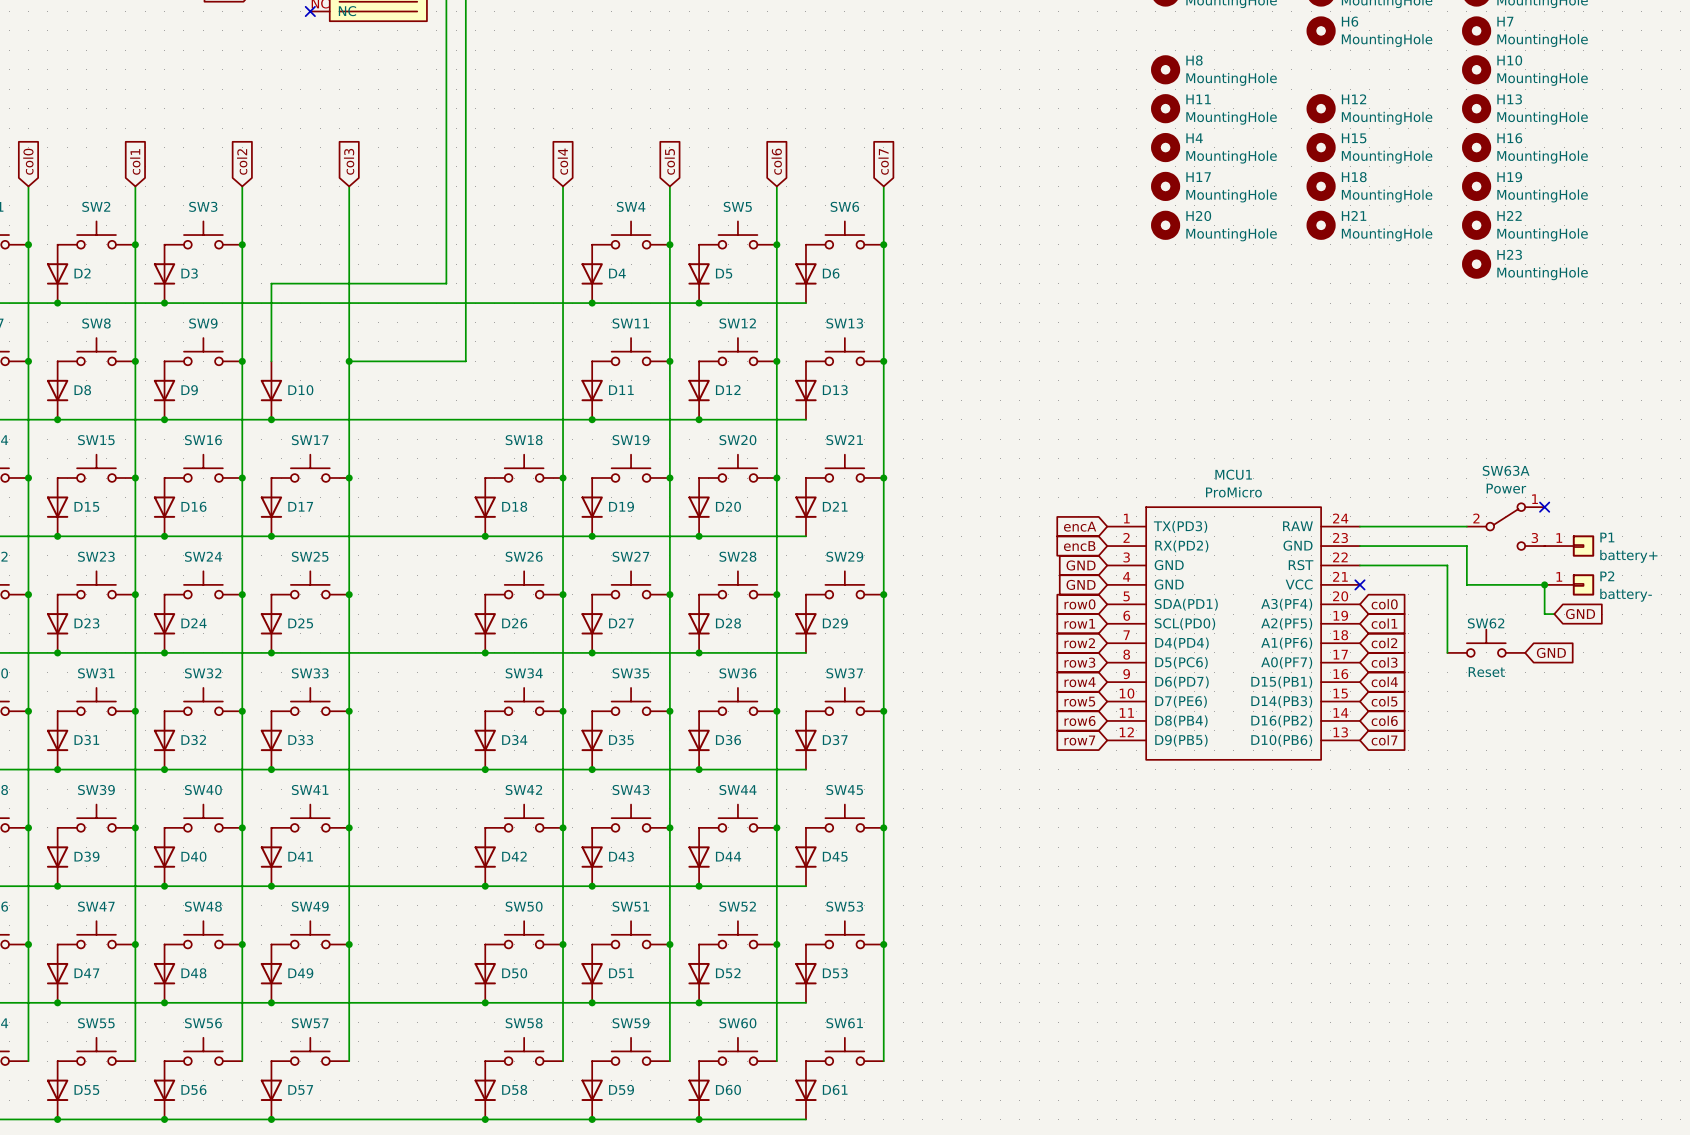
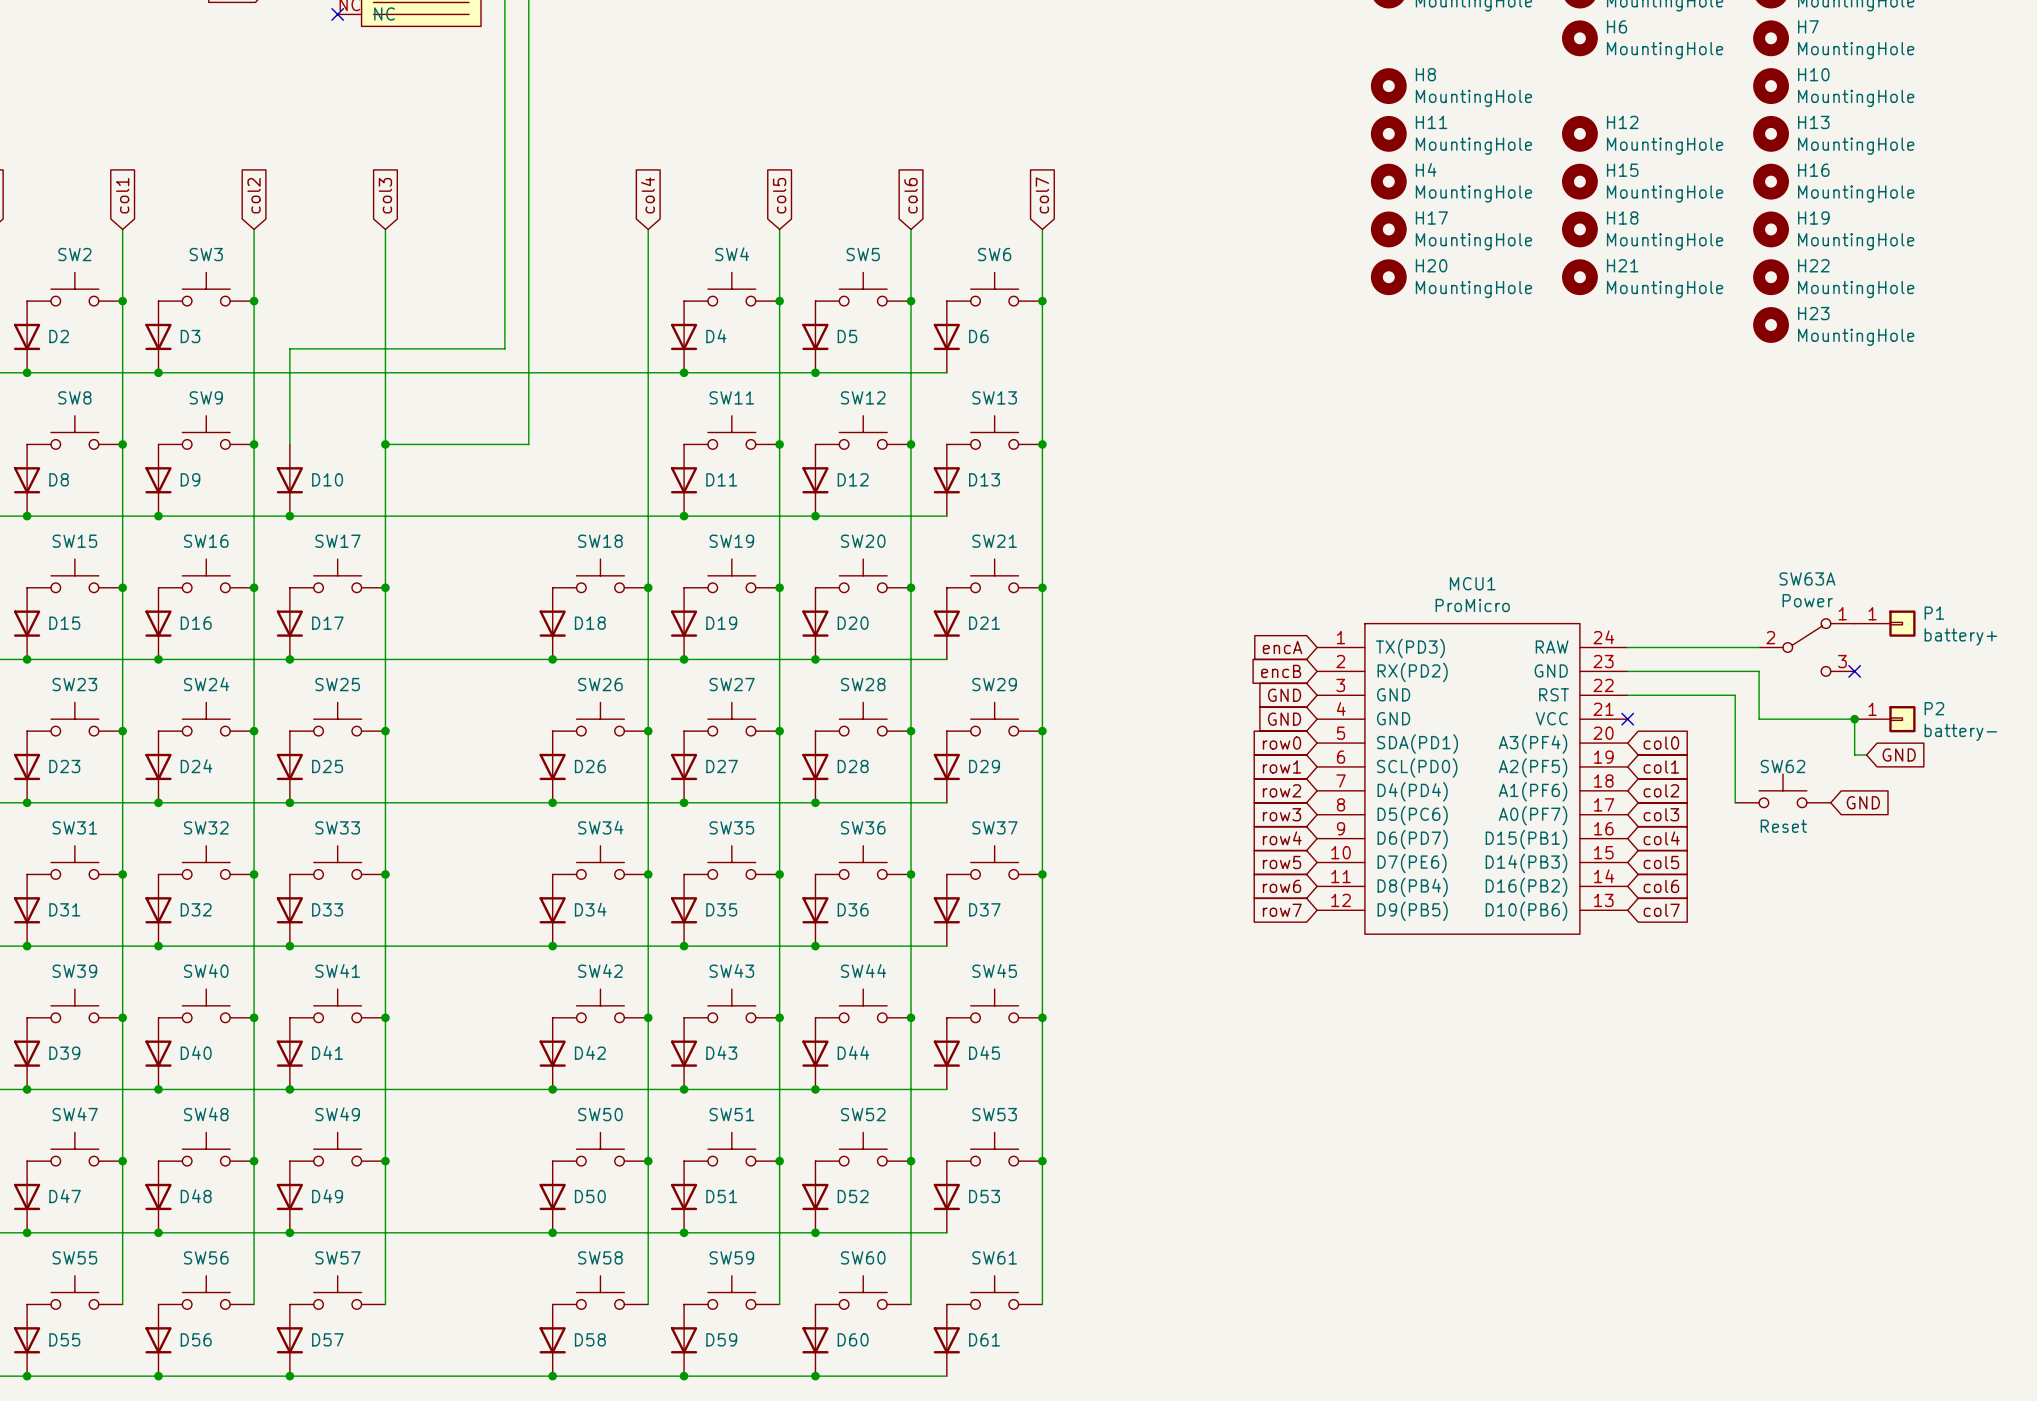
no-connect mark position: (1544, 507) -> (1854, 671)
P1 position: (1569, 546) -> (1885, 623)

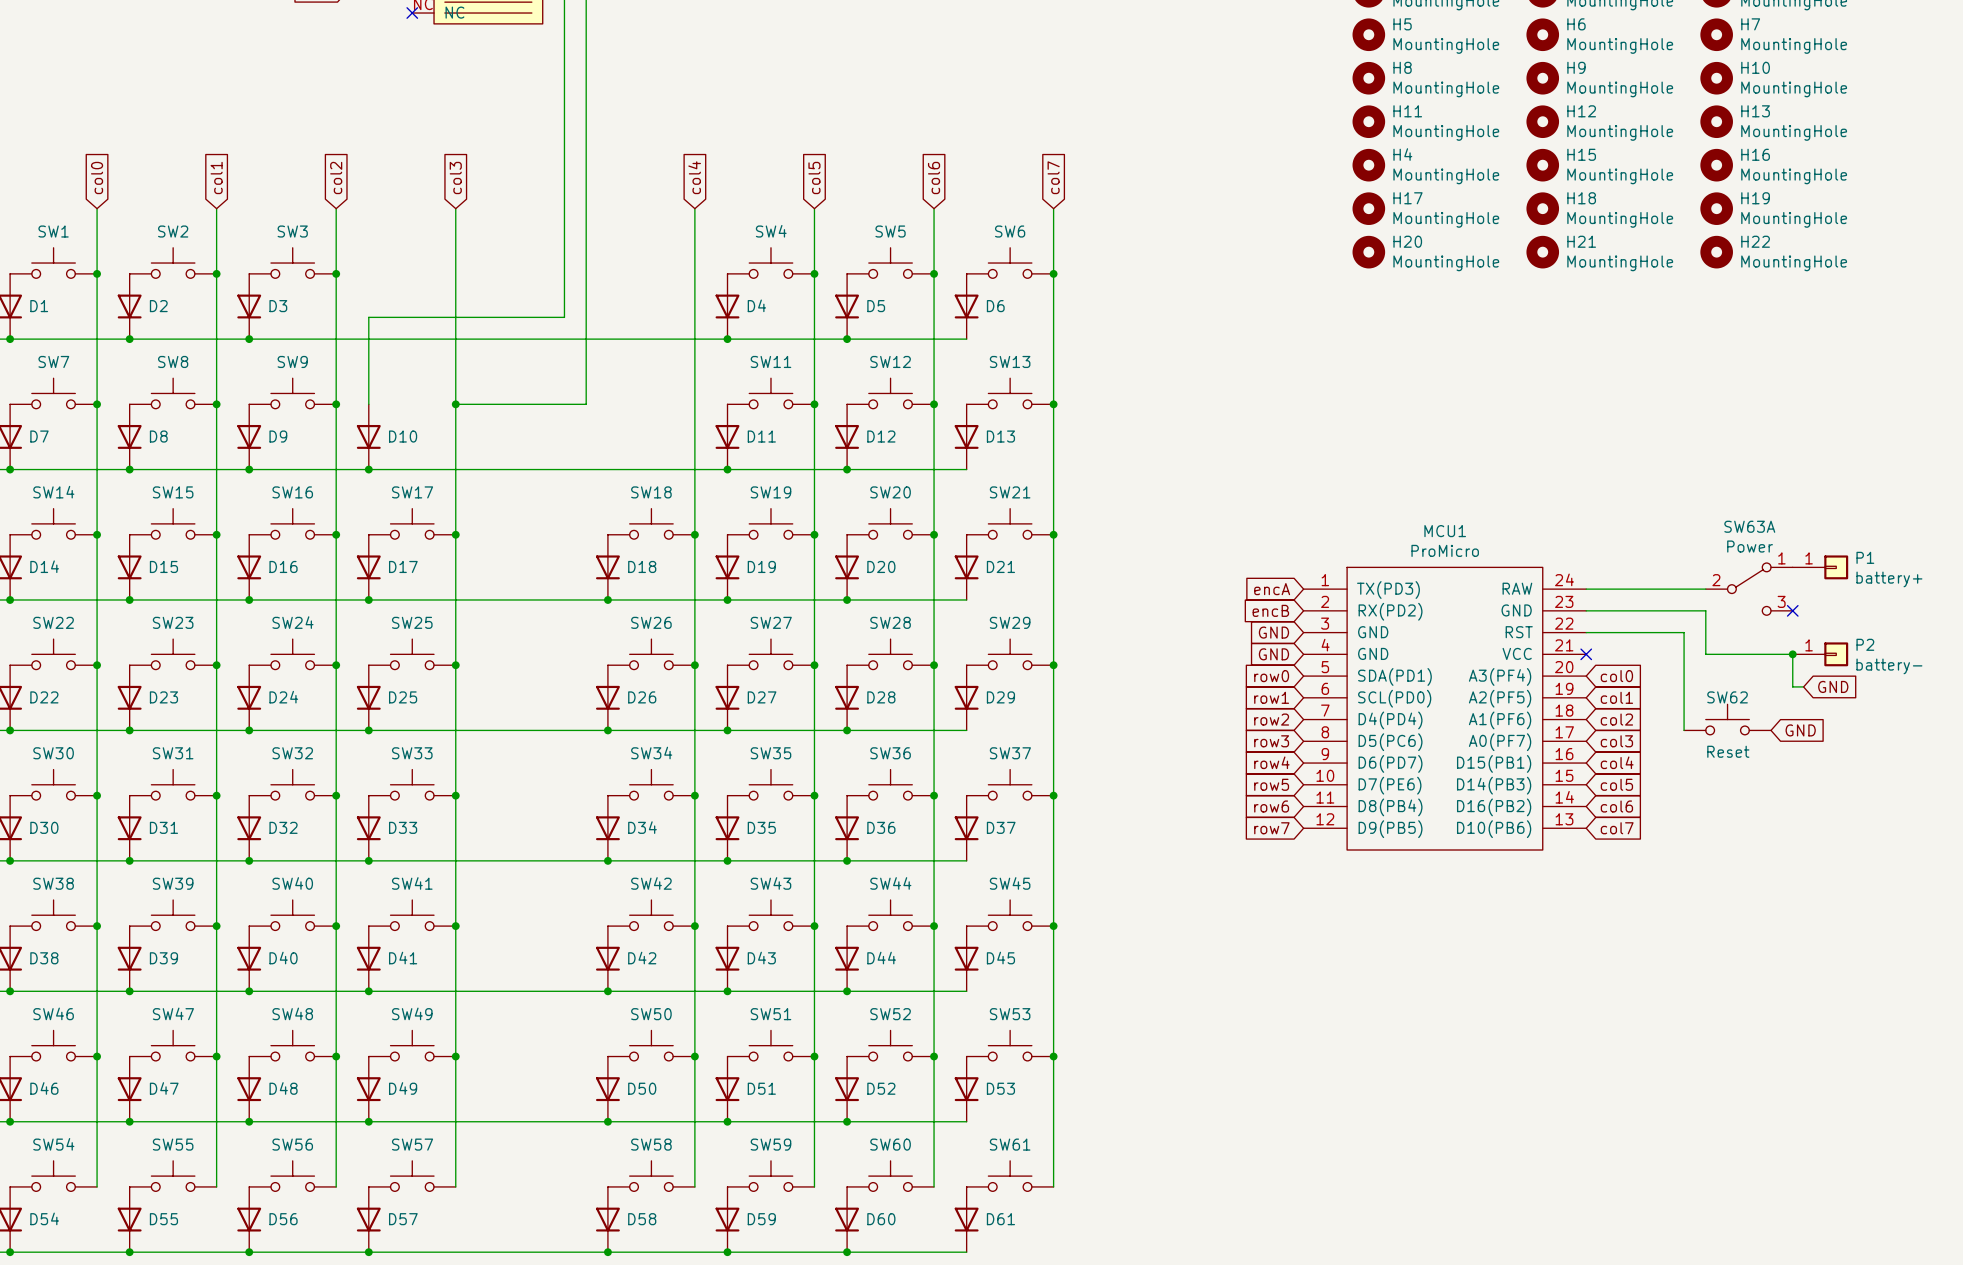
H5: none -> MountingHole (1368, 34)
H9: none -> MountingHole (1542, 78)
H23: MountingHole (1771, 324) -> none

